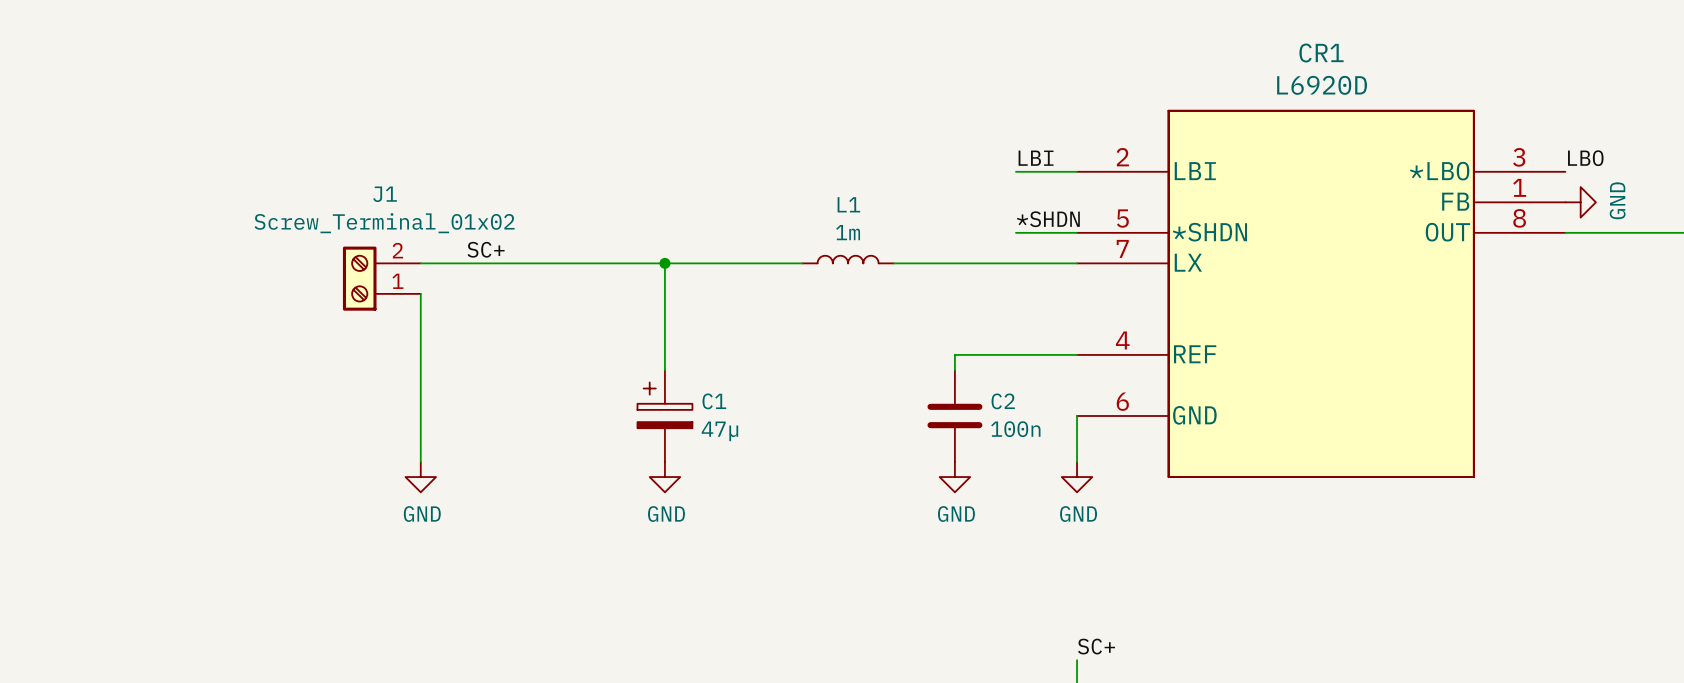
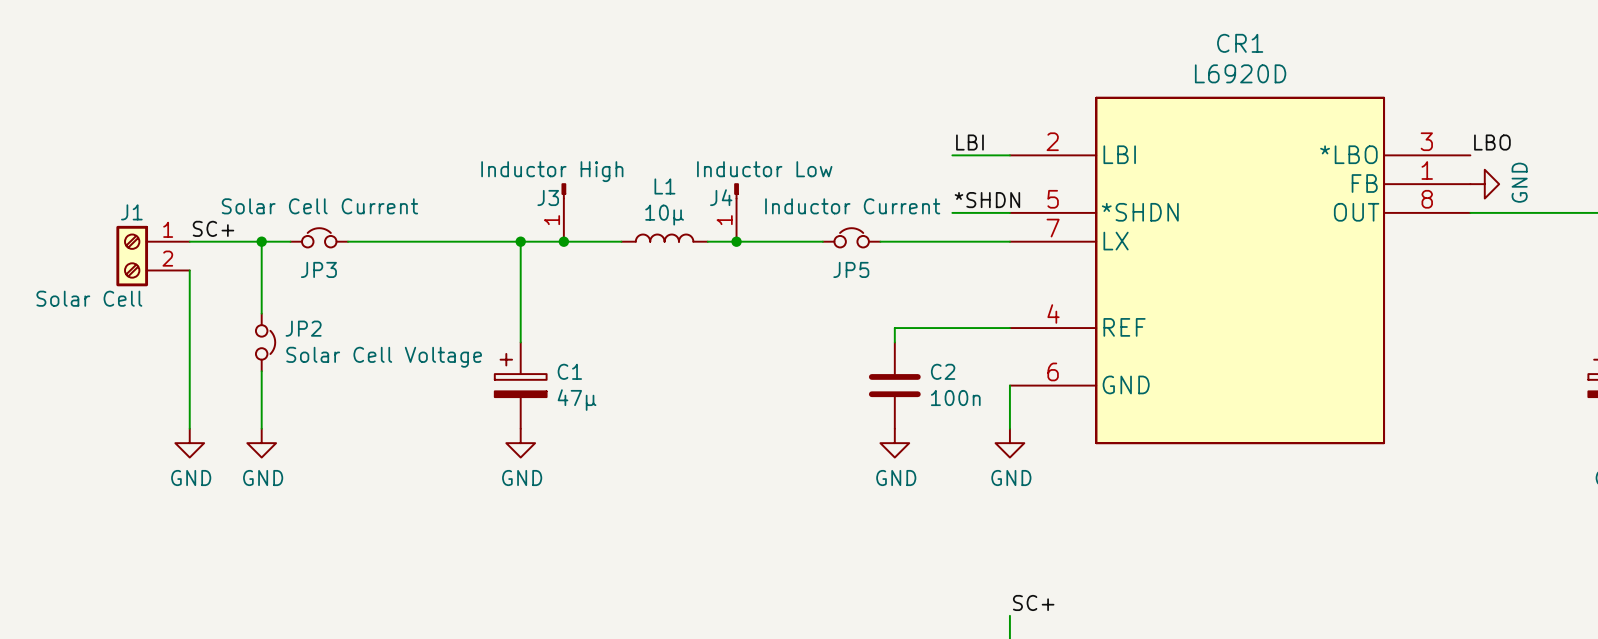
J1 name position: J1 (385, 194) -> J1 (131, 212)
J1 value: Screw_Terminal_01x02 (384, 223) -> Solar Cell (89, 298)
J3: none -> Inductor High (563, 212)
J4: none -> Inductor Low (736, 212)
L1 value: 1m (848, 232) -> 10µ (664, 215)
label position: SC+ (486, 249) -> SC+ (213, 228)
JP3: none -> Solar Cell Current (319, 237)
L1 position: (848, 259) -> (664, 238)
JP5: none -> Inductor Current (851, 237)
wire: none -> (189, 241) (290, 241)
wire: none -> (261, 241) (261, 313)
junction: none -> (261, 241)
wire: none -> (520, 241) (520, 342)
junction: none -> (520, 241)
junction: none -> (563, 241)
junction: (664, 263) -> none
wire: (756, 263) (664, 263) (664, 370) -> none
junction: none -> (736, 241)
wire: none -> (750, 241) (822, 241)
wire: (893, 263) (939, 263) -> none
J1 flip: as is (359, 278) -> up-down (132, 256)
J1 position: (381, 278) -> (153, 256)
wire: (420, 293) (420, 461) -> (189, 270) (189, 428)
JP2: none -> Solar Cell Voltage (265, 342)
wire: none -> (261, 371) (261, 428)
C1 position: (664, 415) -> (520, 385)
power symbol: none -> GND (189, 443)
power symbol: none -> GND (261, 443)
power symbol: GND (420, 477) -> none
power symbol: none -> GND (520, 443)
power symbol: GND (664, 477) -> none

